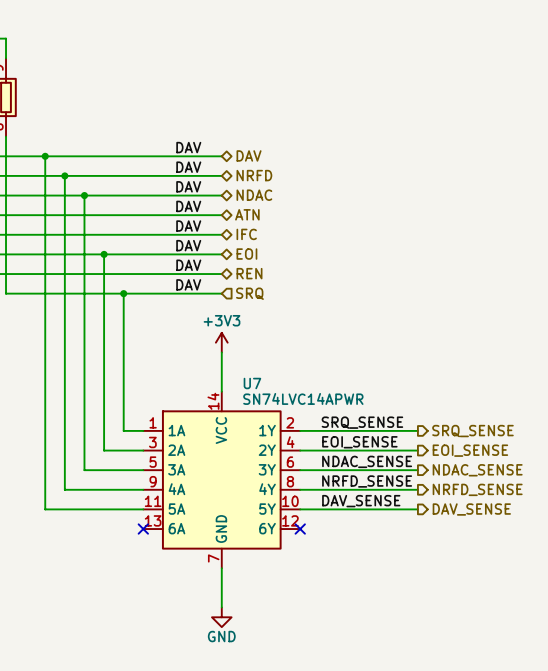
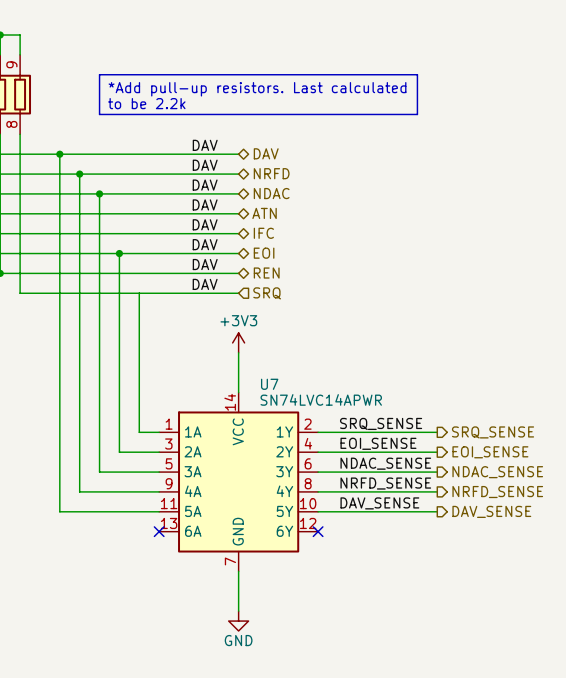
line: none -> (99, 74) (417, 74) (417, 114) (99, 114) (99, 74)
text: none -> *Add pull-up resistors. Last calculated (257, 89)
text: none -> to be 2.2k (146, 103)
junction: (123, 293) -> none

